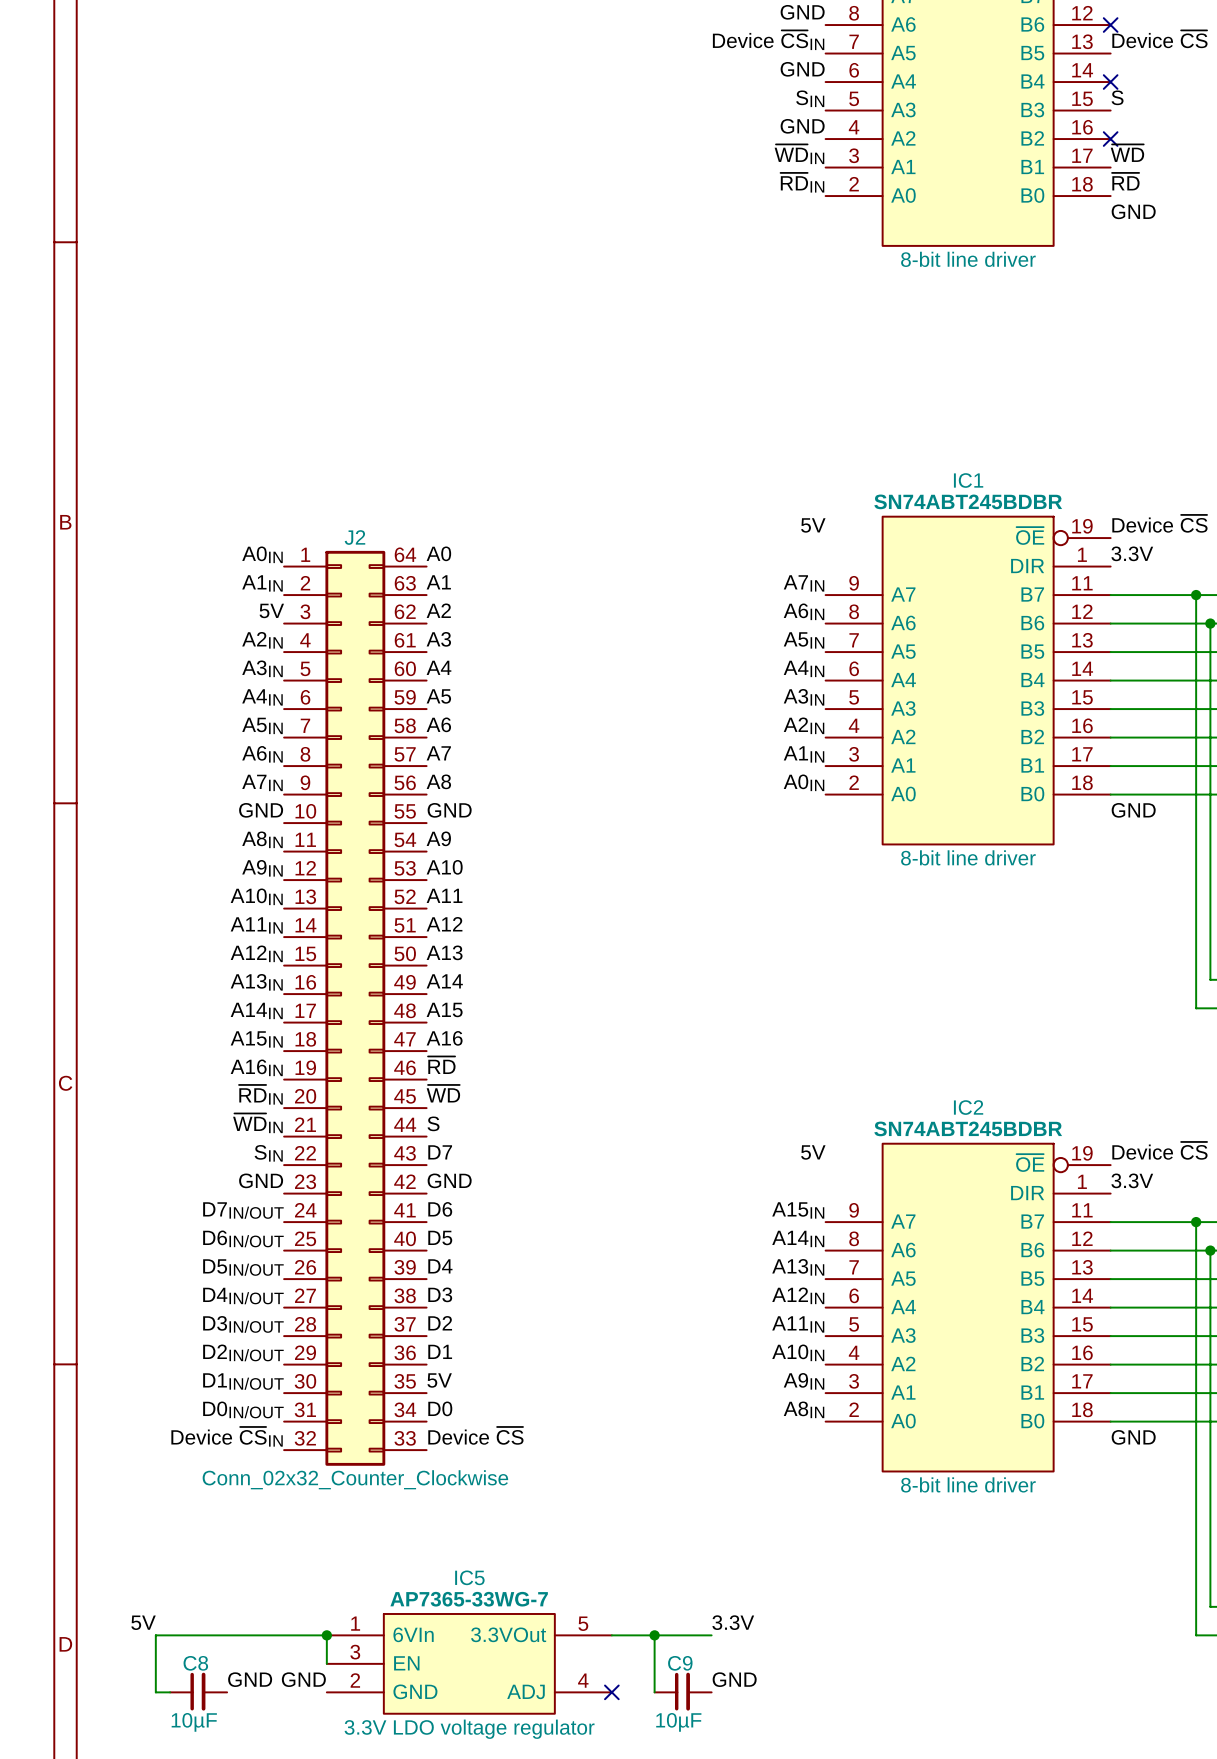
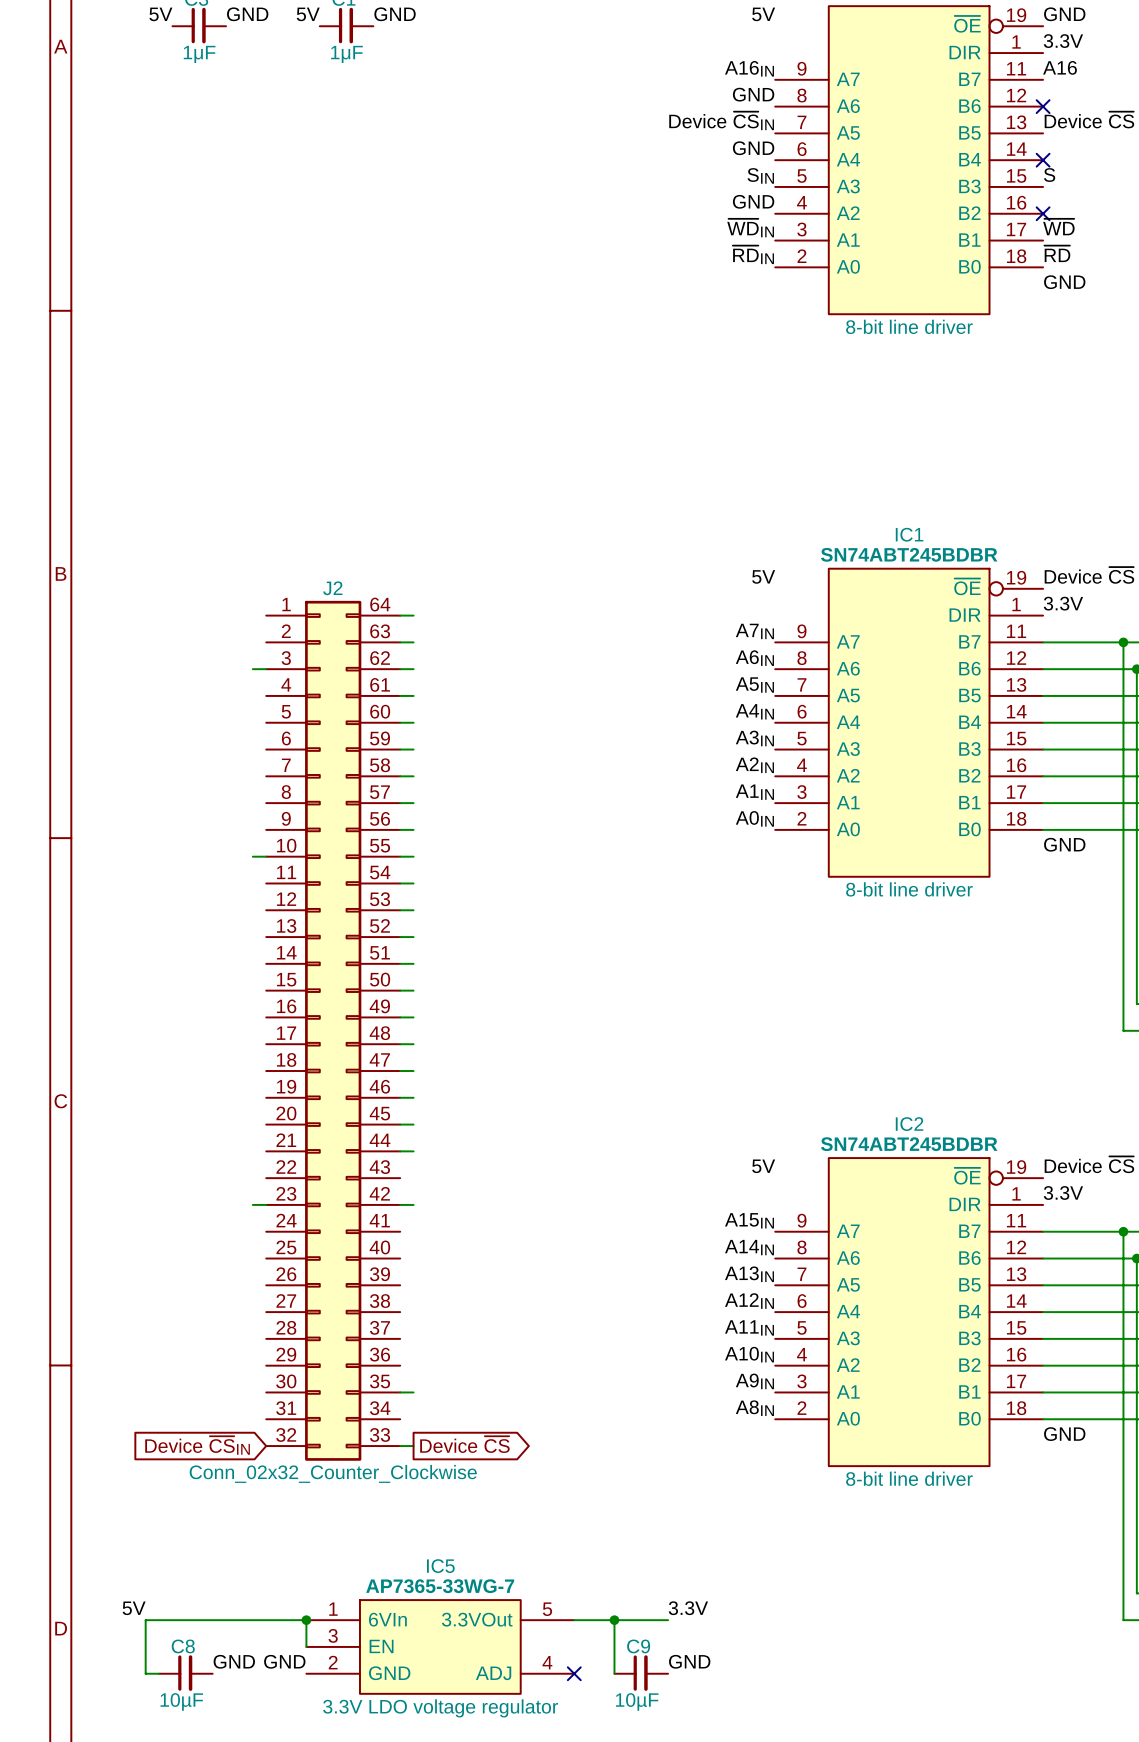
label: A0 (438, 553) -> none
label: A0IN (262, 554) -> none
wire: none -> (400, 615) (413, 615)
label: A1 (438, 582) -> none
label: A1IN (262, 583) -> none
wire: none -> (400, 642) (413, 642)
label: 5V (271, 610) -> none
label: A2 (438, 610) -> none
wire: none -> (252, 669) (266, 669)
wire: none -> (400, 669) (413, 669)
label: A3 (438, 639) -> none
label: A2IN (262, 640) -> none
wire: none -> (400, 695) (413, 695)
label: A4 (438, 667) -> none
label: A3IN (262, 668) -> none
wire: none -> (400, 722) (413, 722)
label: A5 (438, 696) -> none
label: A4IN (262, 697) -> none
wire: none -> (400, 749) (413, 749)
label: A6 (438, 724) -> none
label: A5IN (262, 725) -> none
wire: none -> (400, 776) (413, 776)
label: A7 (438, 753) -> none
label: A6IN (262, 754) -> none
wire: none -> (400, 803) (413, 803)
label: A8 (438, 781) -> none
label: A7IN (262, 782) -> none
wire: none -> (400, 829) (413, 829)
label: GND (261, 810) -> none
label: GND (449, 810) -> none
wire: none -> (252, 856) (266, 856)
wire: none -> (400, 856) (413, 856)
label: A9 (438, 838) -> none
label: A8IN (262, 839) -> none
wire: none -> (400, 883) (413, 883)
label: A10 (444, 867) -> none
label: A9IN (262, 868) -> none
wire: none -> (400, 910) (413, 910)
label: A11 (444, 895) -> none
label: A10IN (256, 896) -> none
wire: none -> (400, 937) (413, 937)
label: A12 (444, 924) -> none
label: A11IN (256, 925) -> none
wire: none -> (400, 963) (413, 963)
label: A13 (444, 952) -> none
label: A12IN (256, 953) -> none
wire: none -> (400, 990) (413, 990)
label: A14 (444, 981) -> none
label: A13IN (256, 982) -> none
wire: none -> (400, 1017) (413, 1017)
label: A15 (444, 1009) -> none
label: A14IN (256, 1010) -> none
wire: none -> (400, 1044) (413, 1044)
label: A16 (444, 1038) -> none
label: A15IN (256, 1039) -> none
wire: none -> (400, 1071) (413, 1071)
label: ~{RD} (441, 1065) -> none
label: A16IN (256, 1067) -> none
wire: none -> (400, 1097) (413, 1097)
label: ~{WD} (443, 1093) -> none
label: ~{RD}IN (260, 1094) -> none
wire: none -> (400, 1124) (413, 1124)
label: ~{WD}IN (257, 1123) -> none
label: S (433, 1123) -> none
wire: none -> (400, 1151) (413, 1151)
label: D7 (440, 1152) -> none
label: SIN (268, 1153) -> none
label: GND (261, 1180) -> none
label: GND (449, 1180) -> none
wire: none -> (252, 1204) (266, 1204)
wire: none -> (400, 1204) (413, 1204)
label: D6 (440, 1209) -> none
label: D7IN/OUT (243, 1210) -> none
label: D5 (440, 1237) -> none
label: D6IN/OUT (243, 1238) -> none
label: D4 (440, 1266) -> none
label: D5IN/OUT (243, 1267) -> none
label: D3 (440, 1294) -> none
label: D4IN/OUT (243, 1296) -> none
label: D2 (440, 1323) -> none
label: D3IN/OUT (243, 1324) -> none
label: D1 (440, 1351) -> none
label: D2IN/OUT (243, 1352) -> none
label: 5V (439, 1380) -> none
label: D1IN/OUT (243, 1381) -> none
wire: none -> (400, 1392) (413, 1392)
label: D0 (440, 1408) -> none
label: D0IN/OUT (243, 1409) -> none
label: Device ~{CS} (475, 1435) -> none
label: Device ~{CS}IN (227, 1436) -> none
global label: none -> Device ~{CS} (464, 1444)
global label: none -> Device ~{CS}IN (197, 1445)
wire: none -> (400, 1446) (413, 1446)

